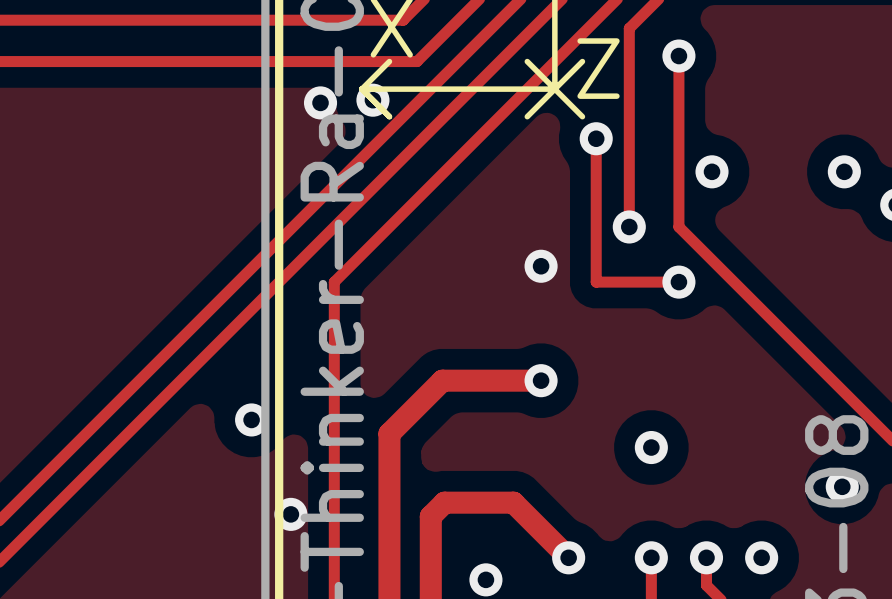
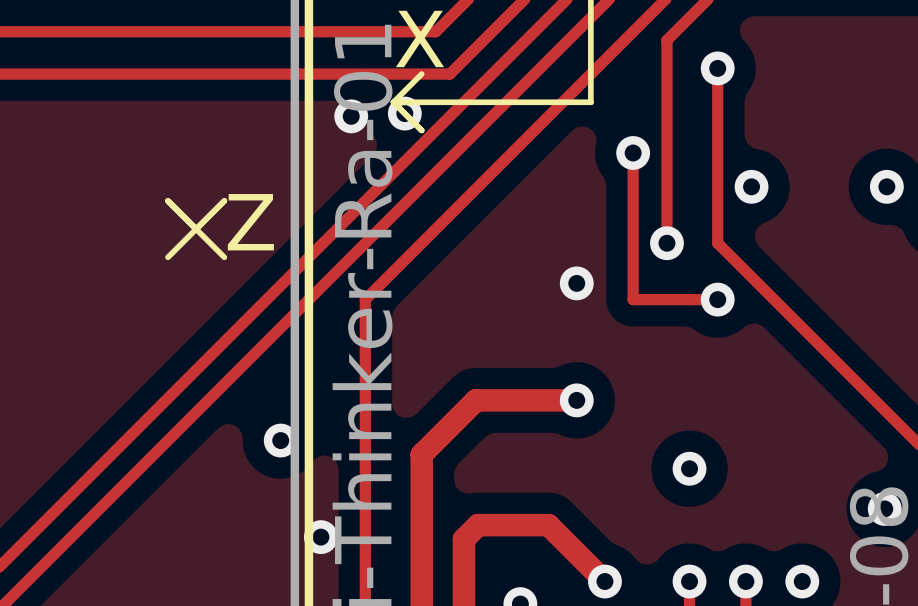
line: (527, 61) (582, 116) -> (167, 200) (224, 257)
line: (582, 61) (527, 116) -> (224, 200) (167, 257)
text position: Z (598, 68) -> Z (250, 222)

